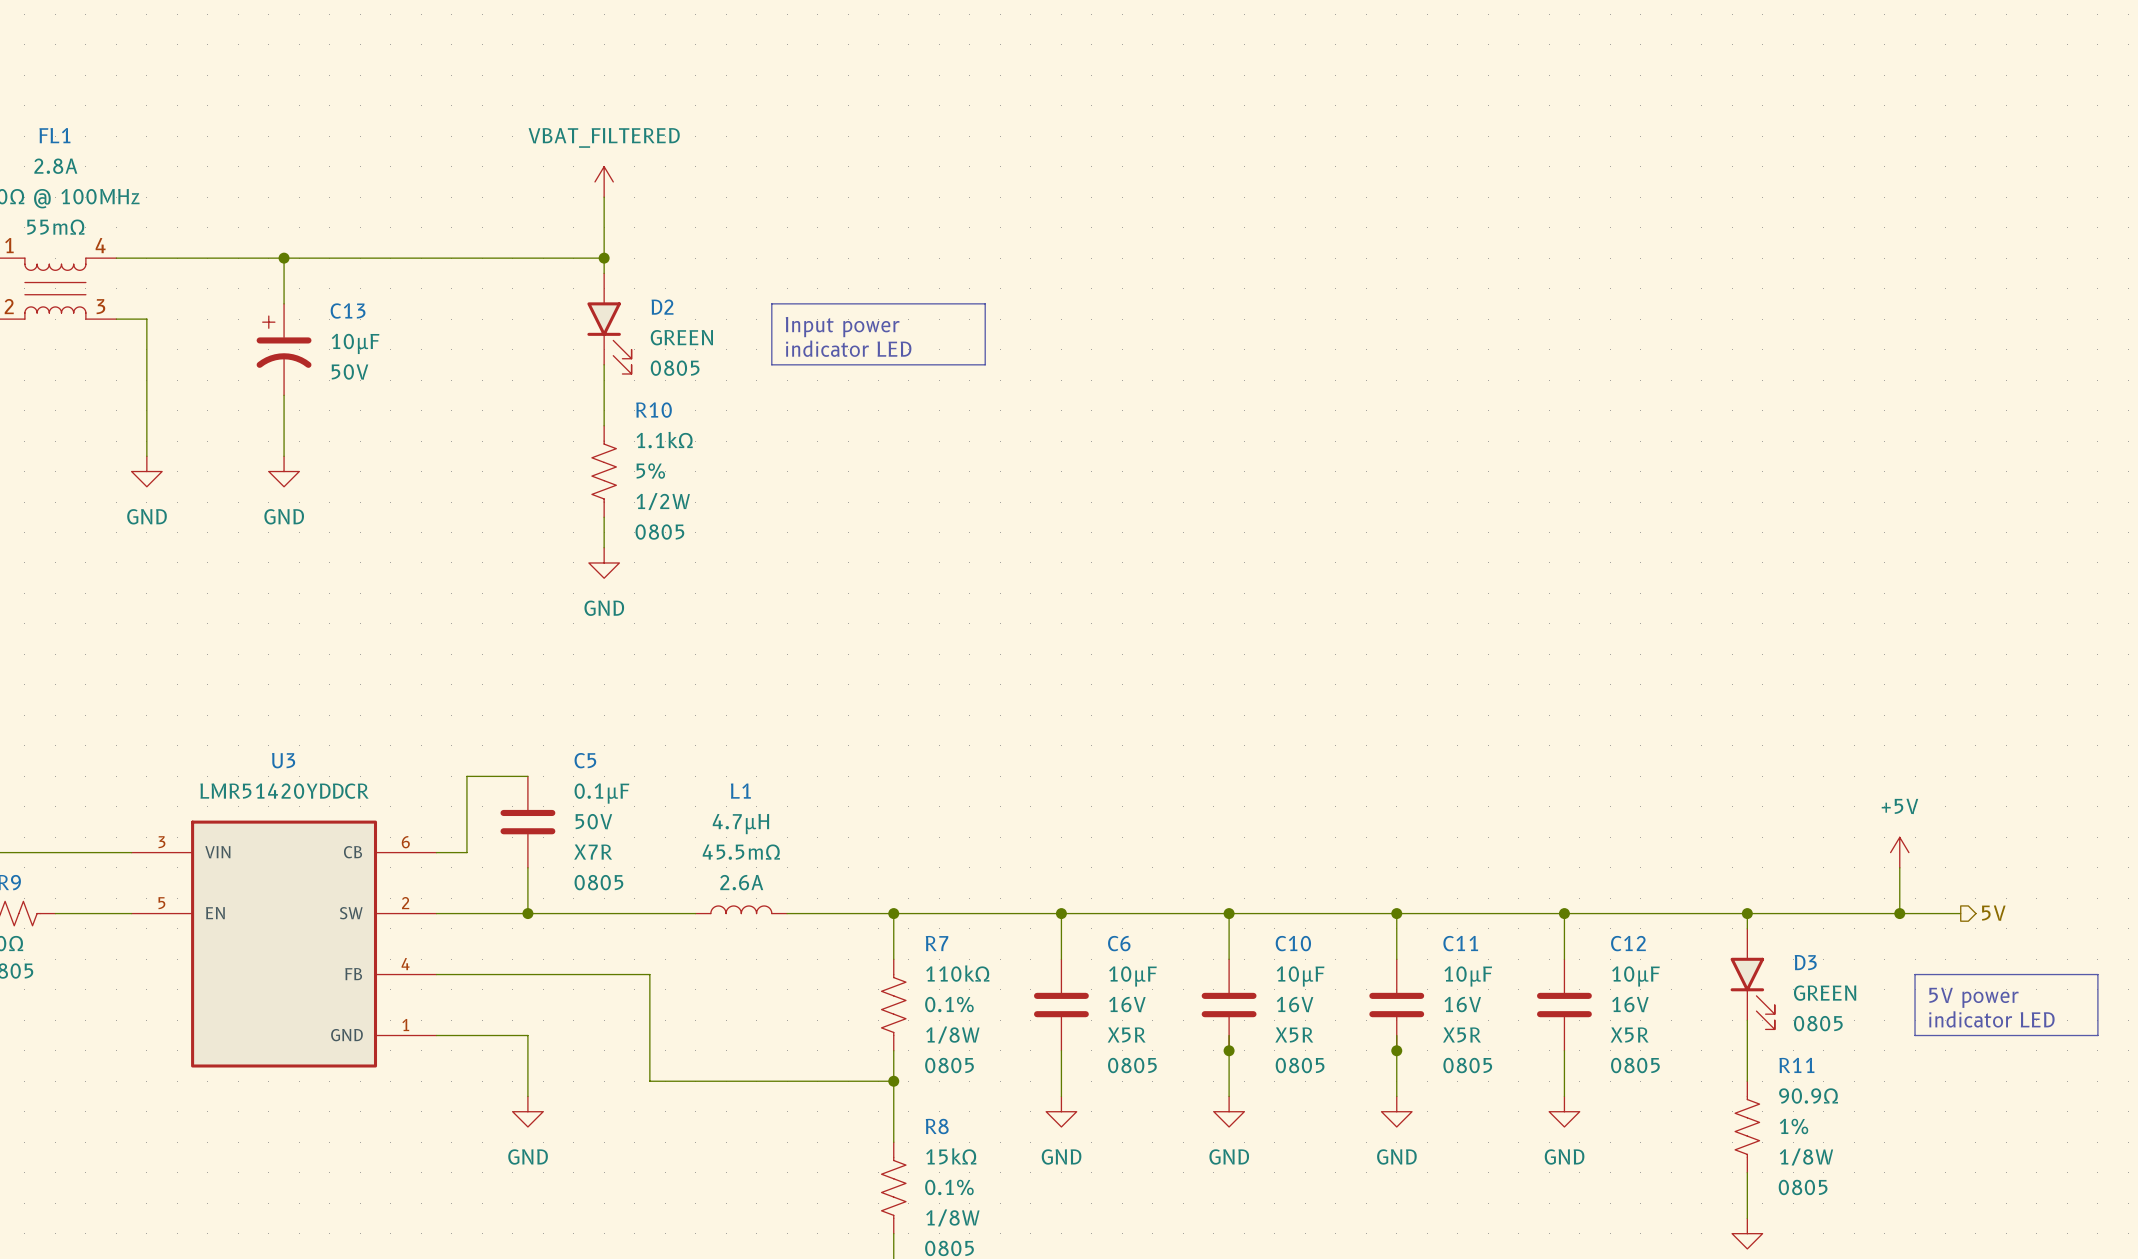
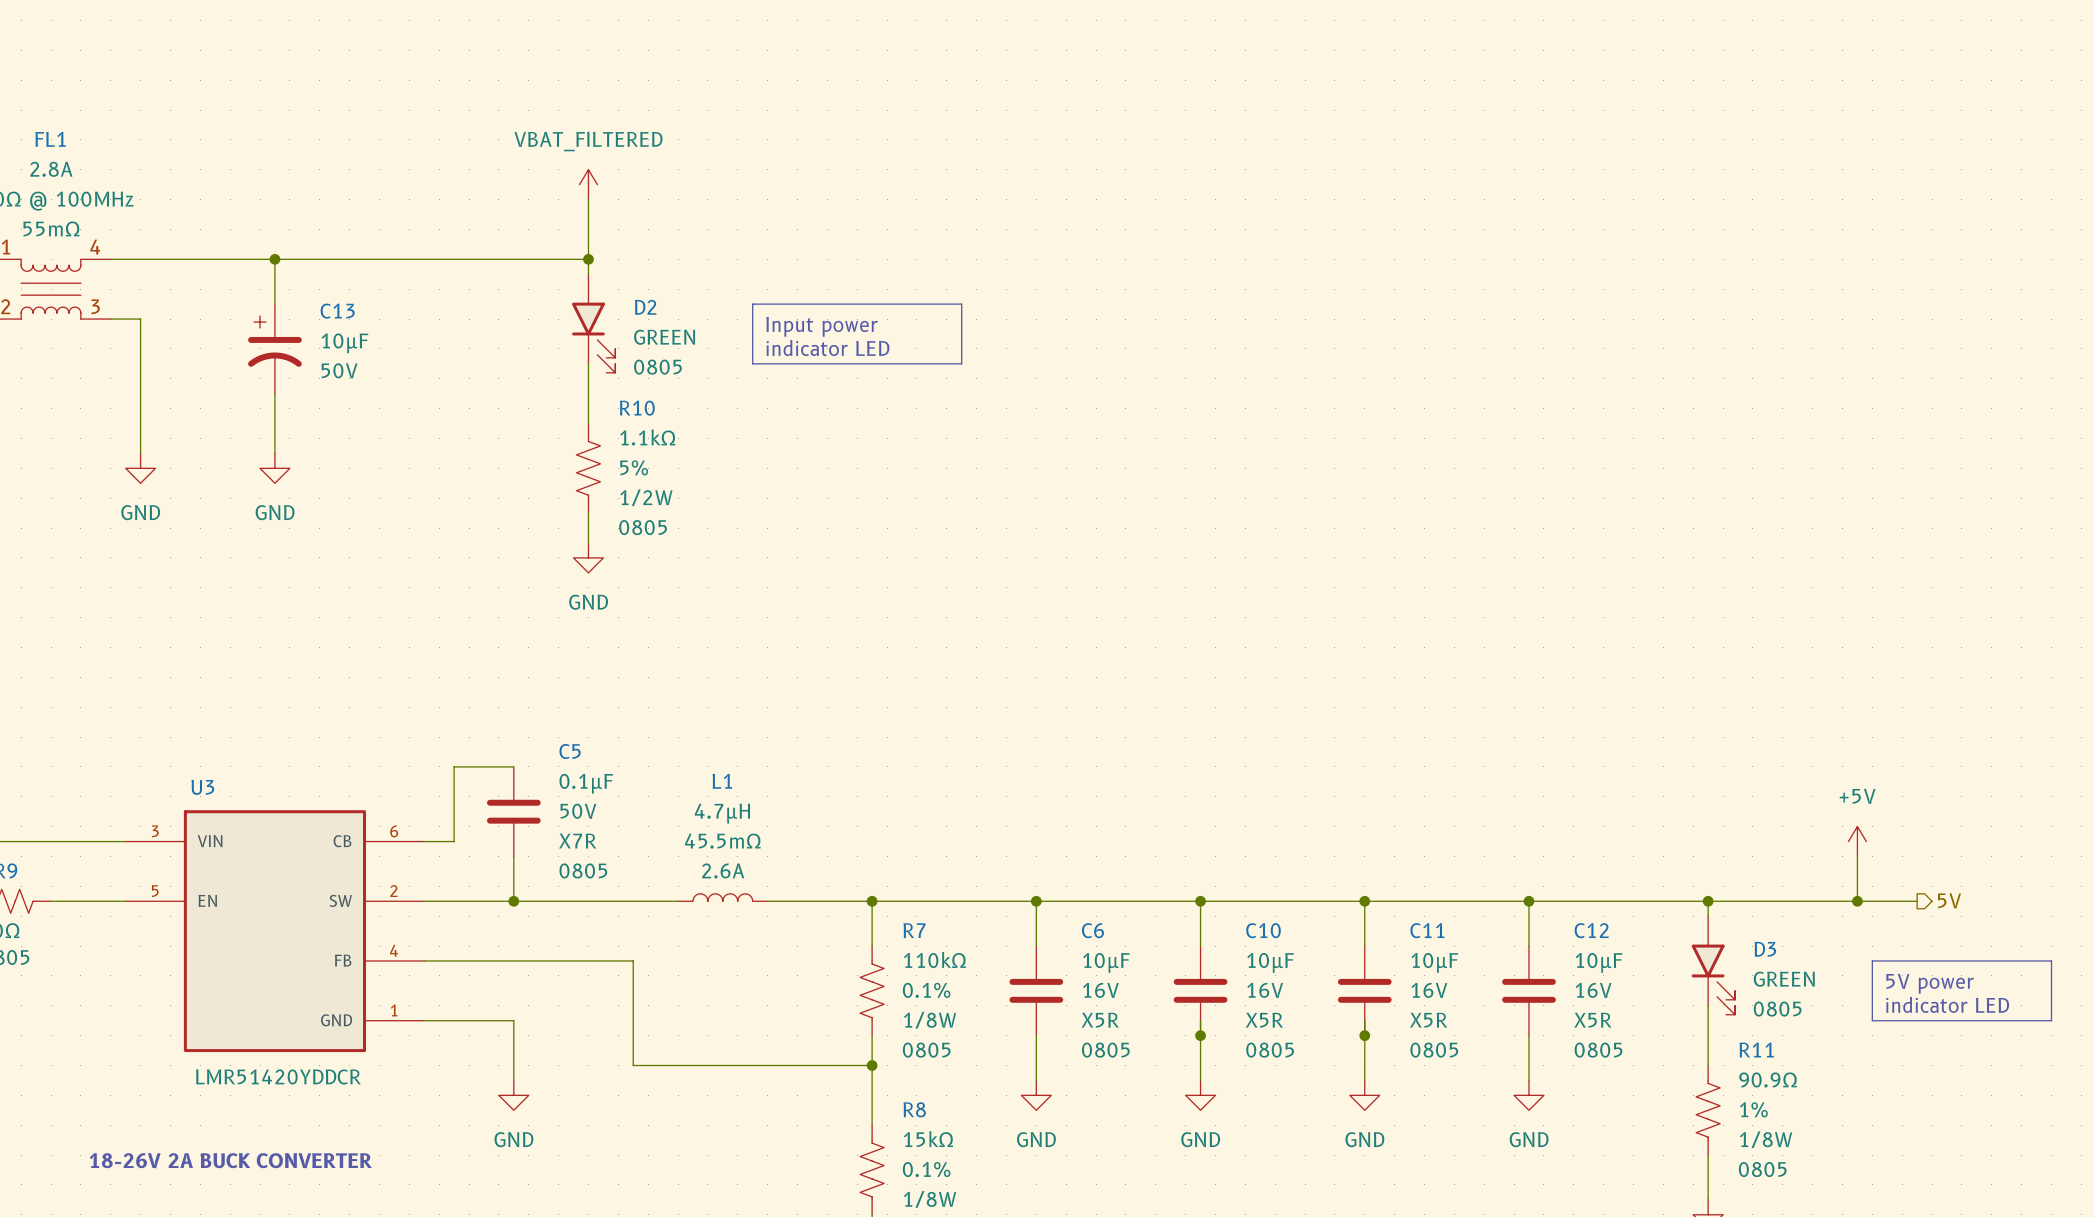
U3 name position: U3 (283, 760) -> U3 (202, 787)
U3 value position: LMR51420YDDCR (284, 791) -> LMR51420YDDCR (278, 1076)
text: none -> 18-26V 2A BUCK CONVERTER (230, 1160)

